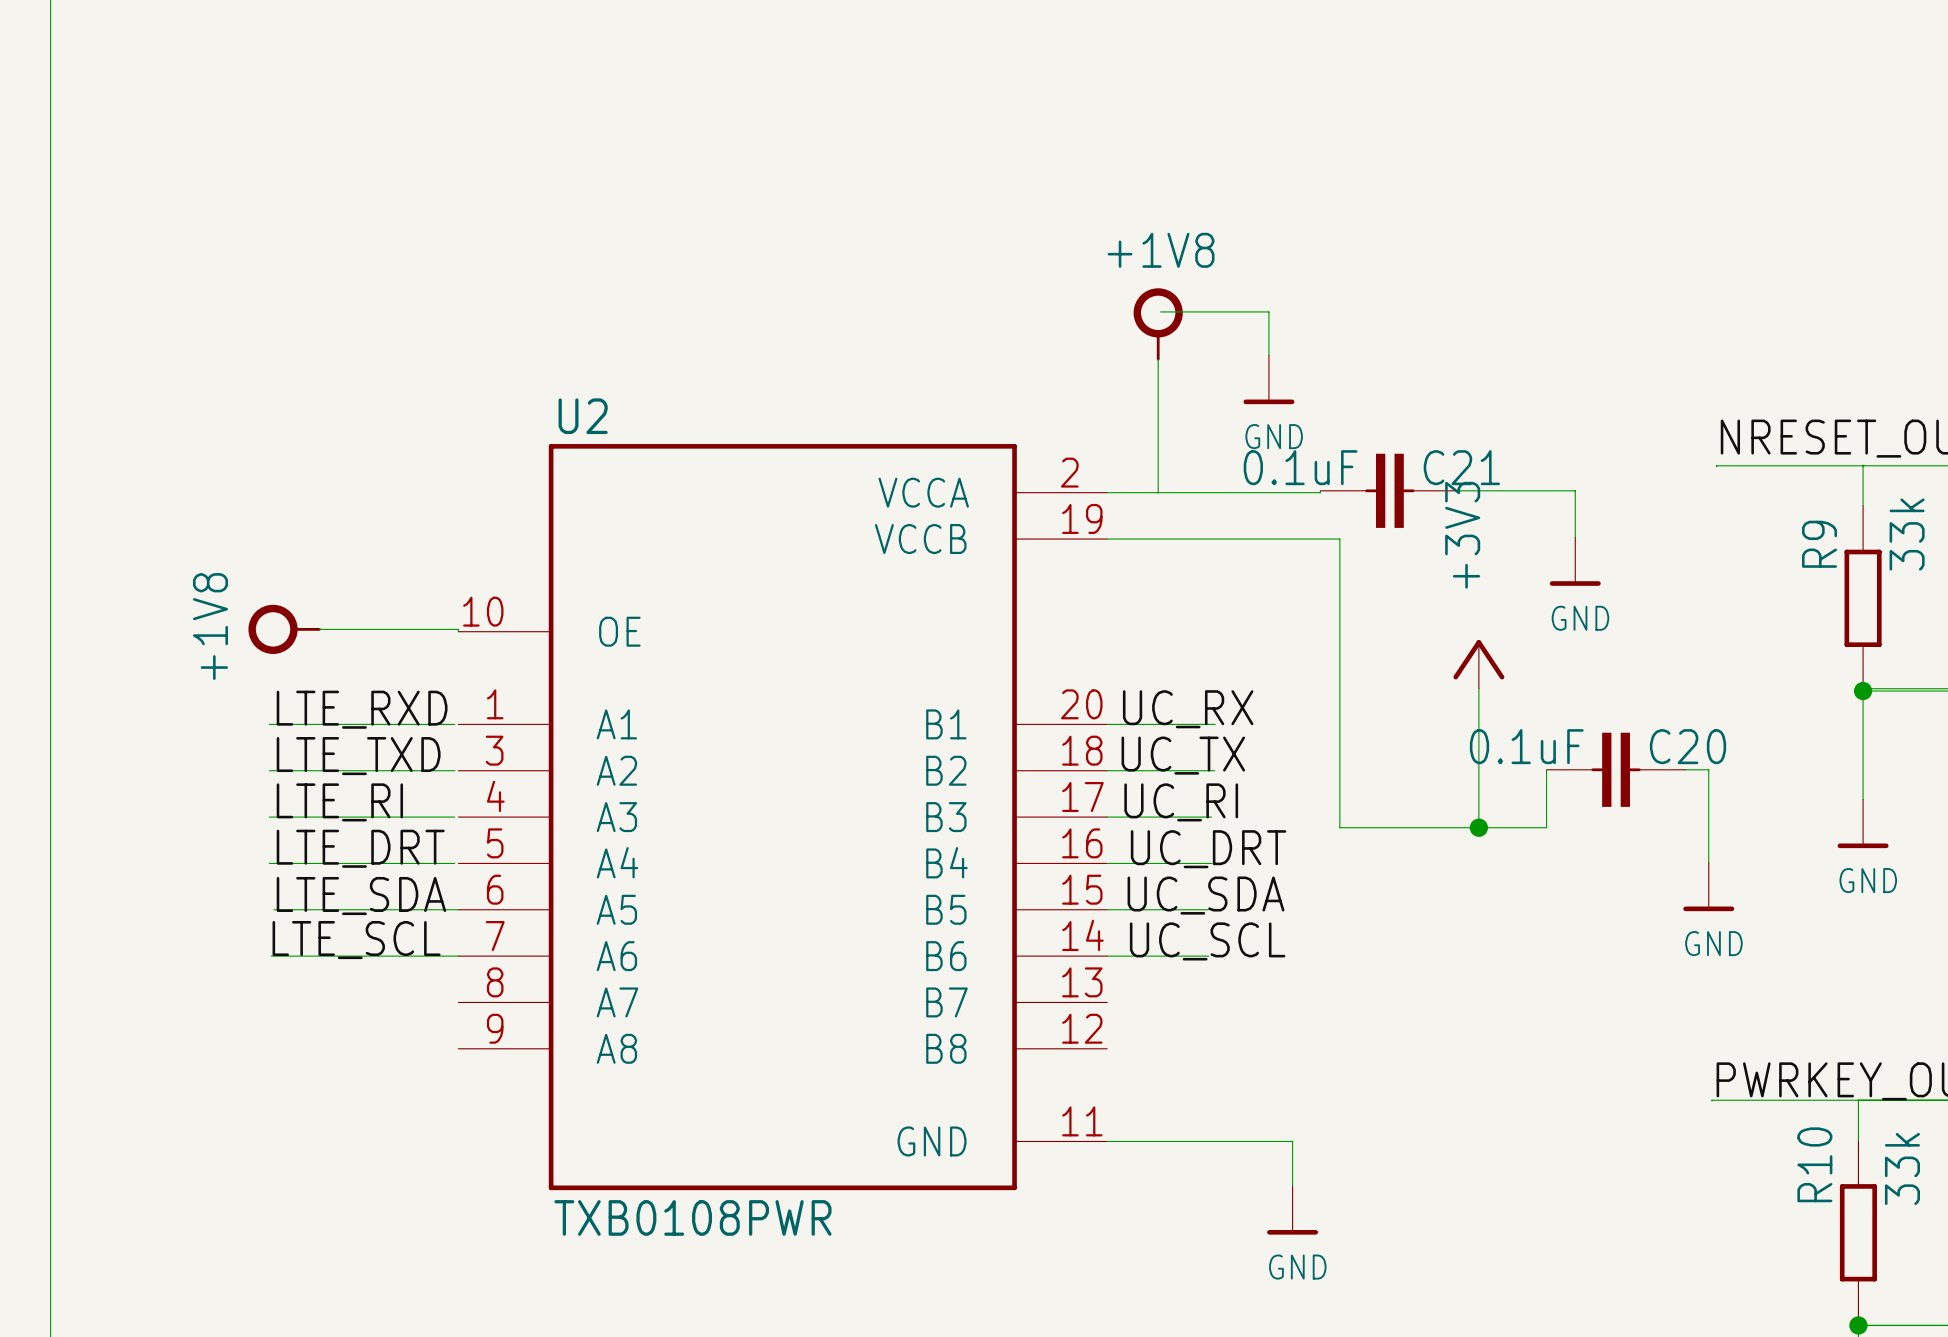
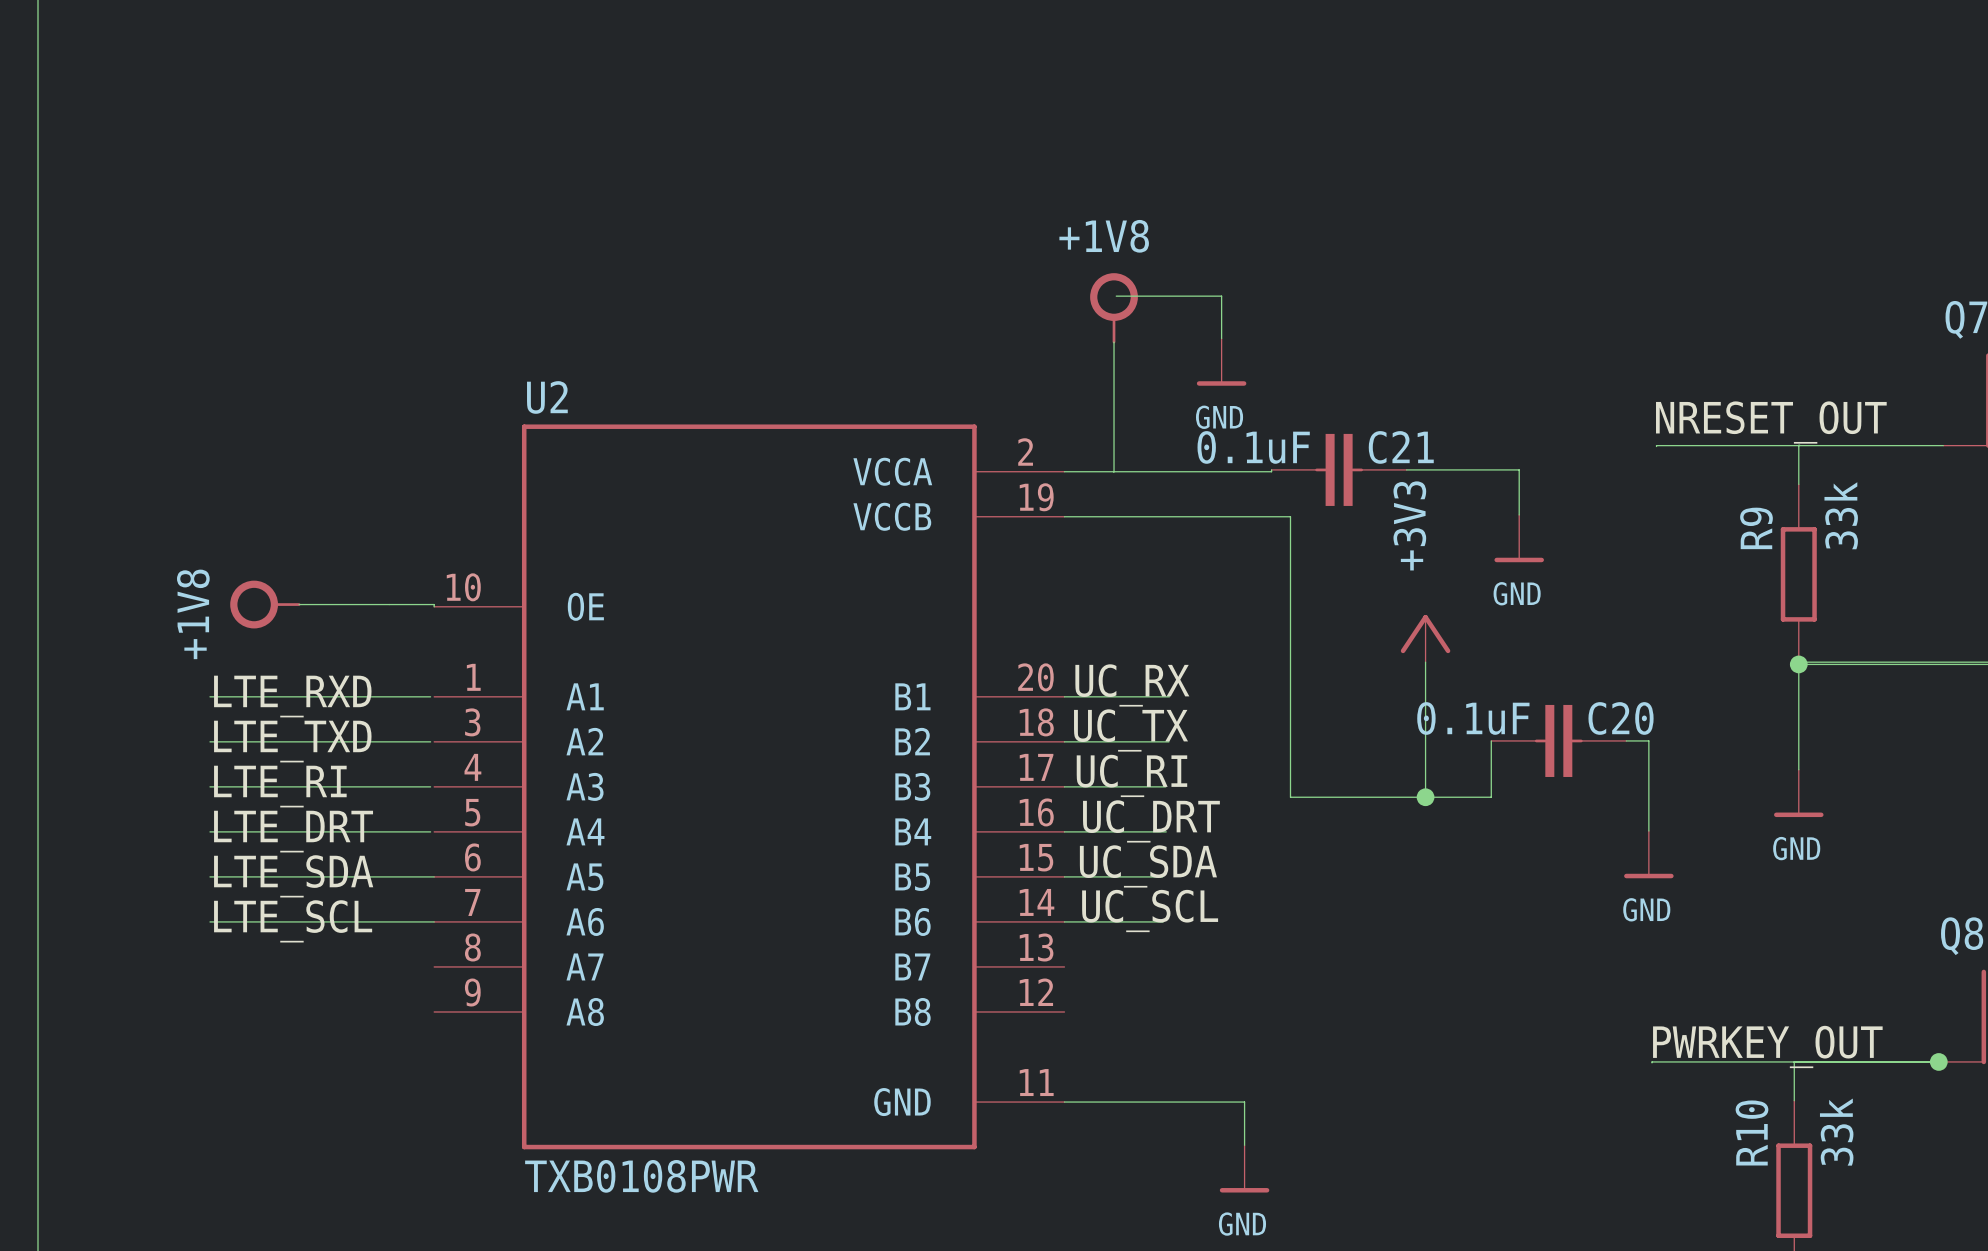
label position: LTE_RXD (362, 709) -> LTE_RXD (292, 696)
wire: none -> (209, 696) (250, 696)
label position: LTE_TXD (358, 756) -> LTE_TXD (292, 741)
wire: none -> (209, 741) (250, 741)
label position: LTE_RI (339, 802) -> LTE_RI (280, 786)
wire: none -> (209, 786) (250, 786)
label position: LTE_DRT (360, 848) -> LTE_DRT (293, 831)
wire: none -> (209, 831) (250, 831)
label position: LTE_SDA (361, 896) -> LTE_SDA (293, 876)
wire: none -> (209, 876) (255, 876)
label position: LTE_SCL (356, 940) -> LTE_SCL (293, 921)
wire: none -> (209, 921) (252, 921)

